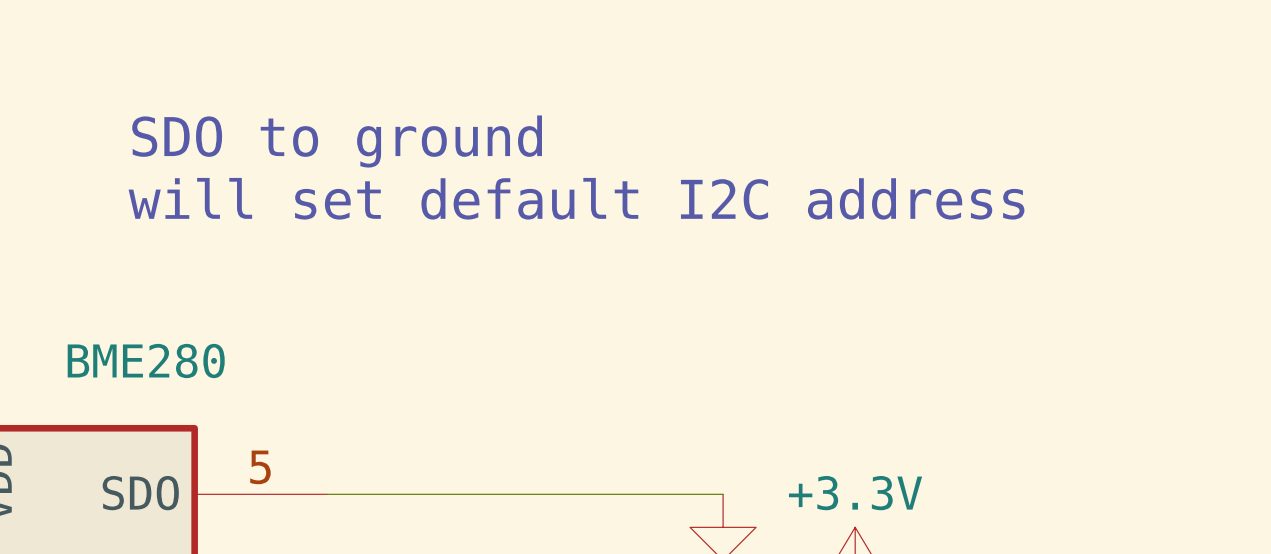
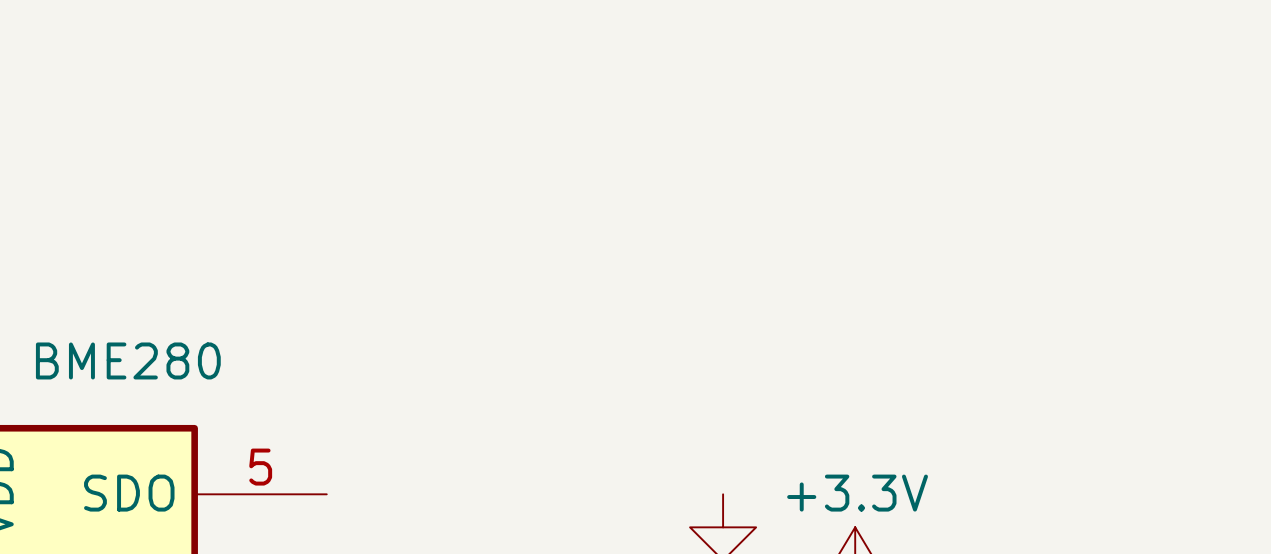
text: SDO to ground (337, 141) -> none
text: will set default I2C address (576, 198) -> none
wire: (326, 494) (723, 494) -> none

